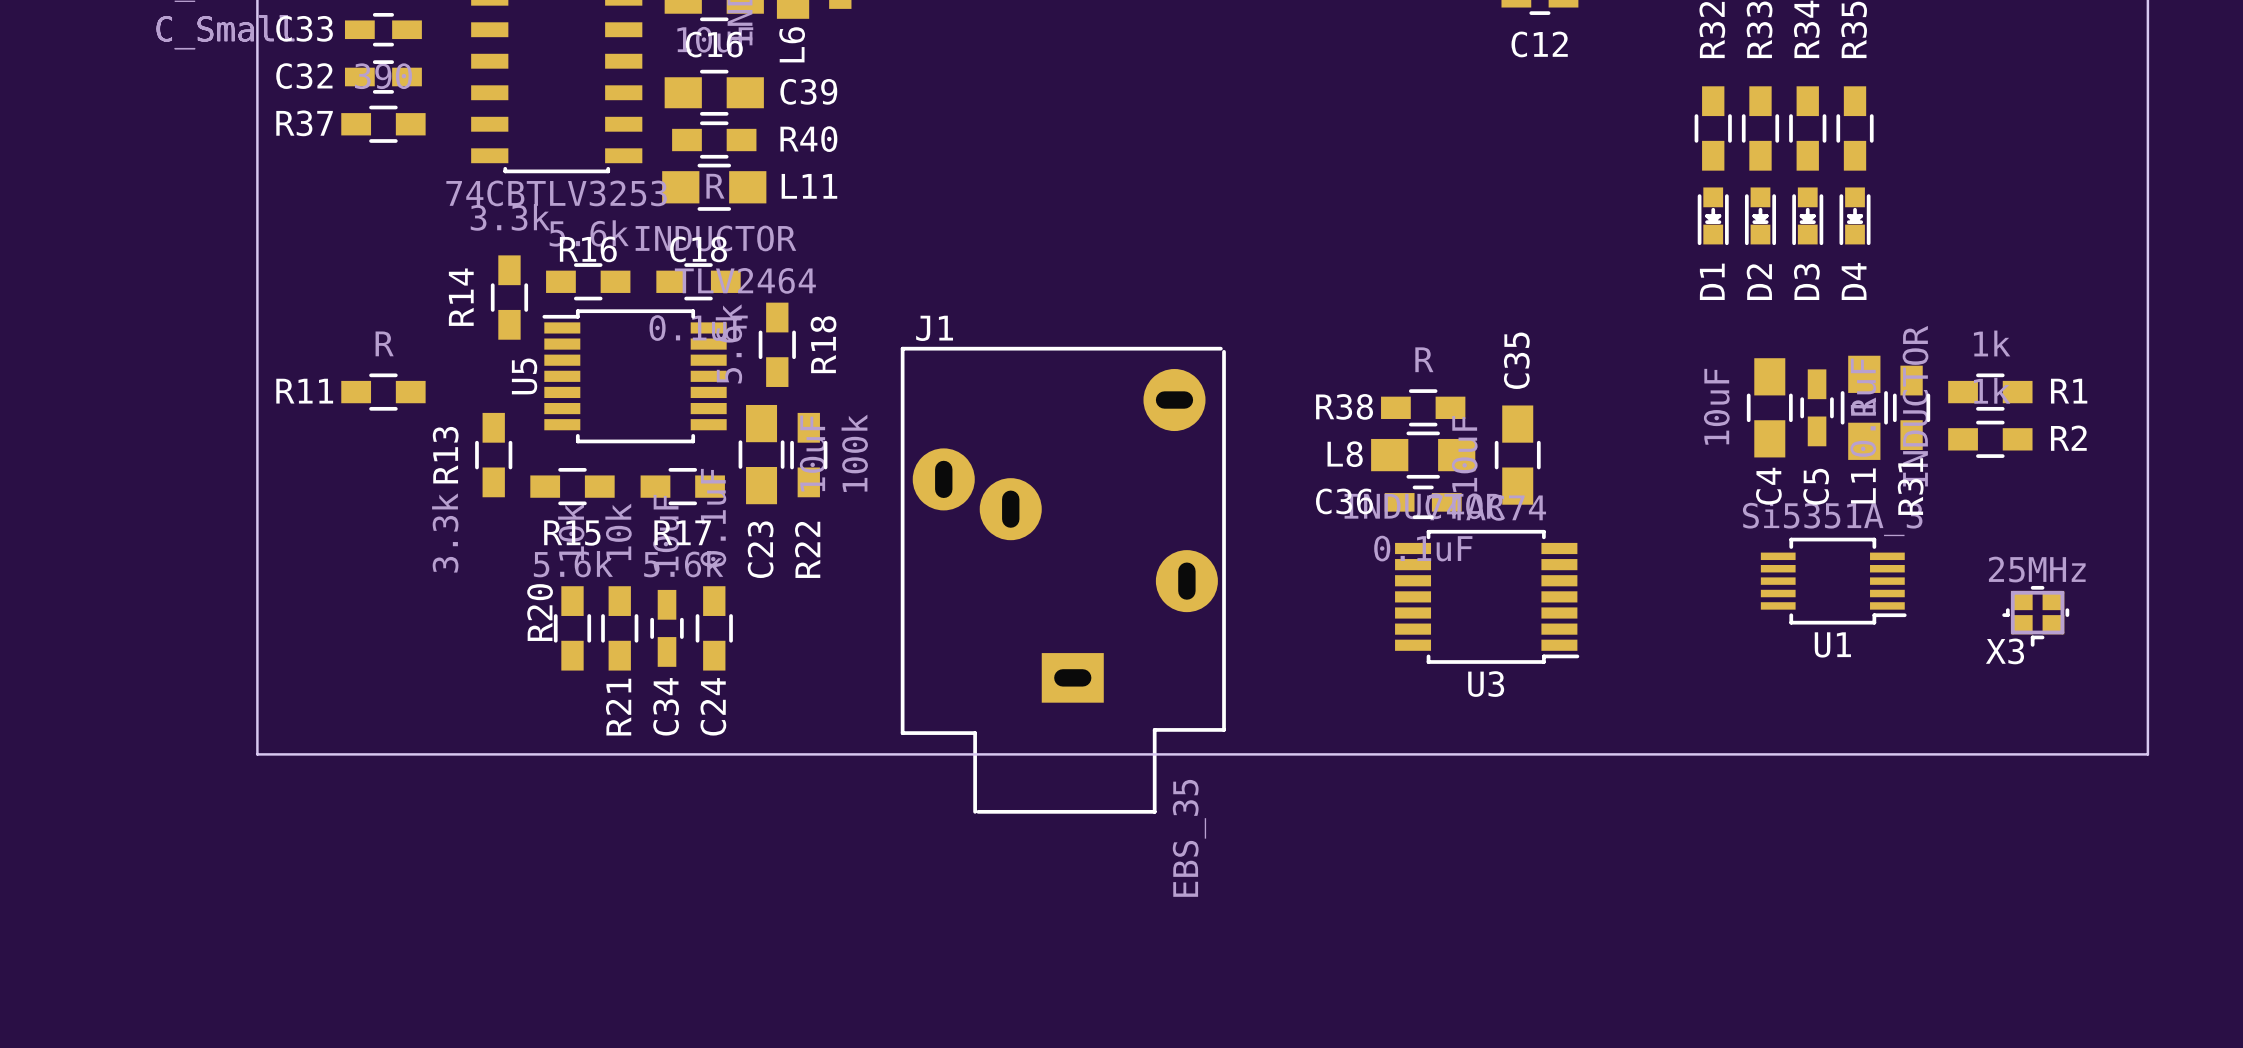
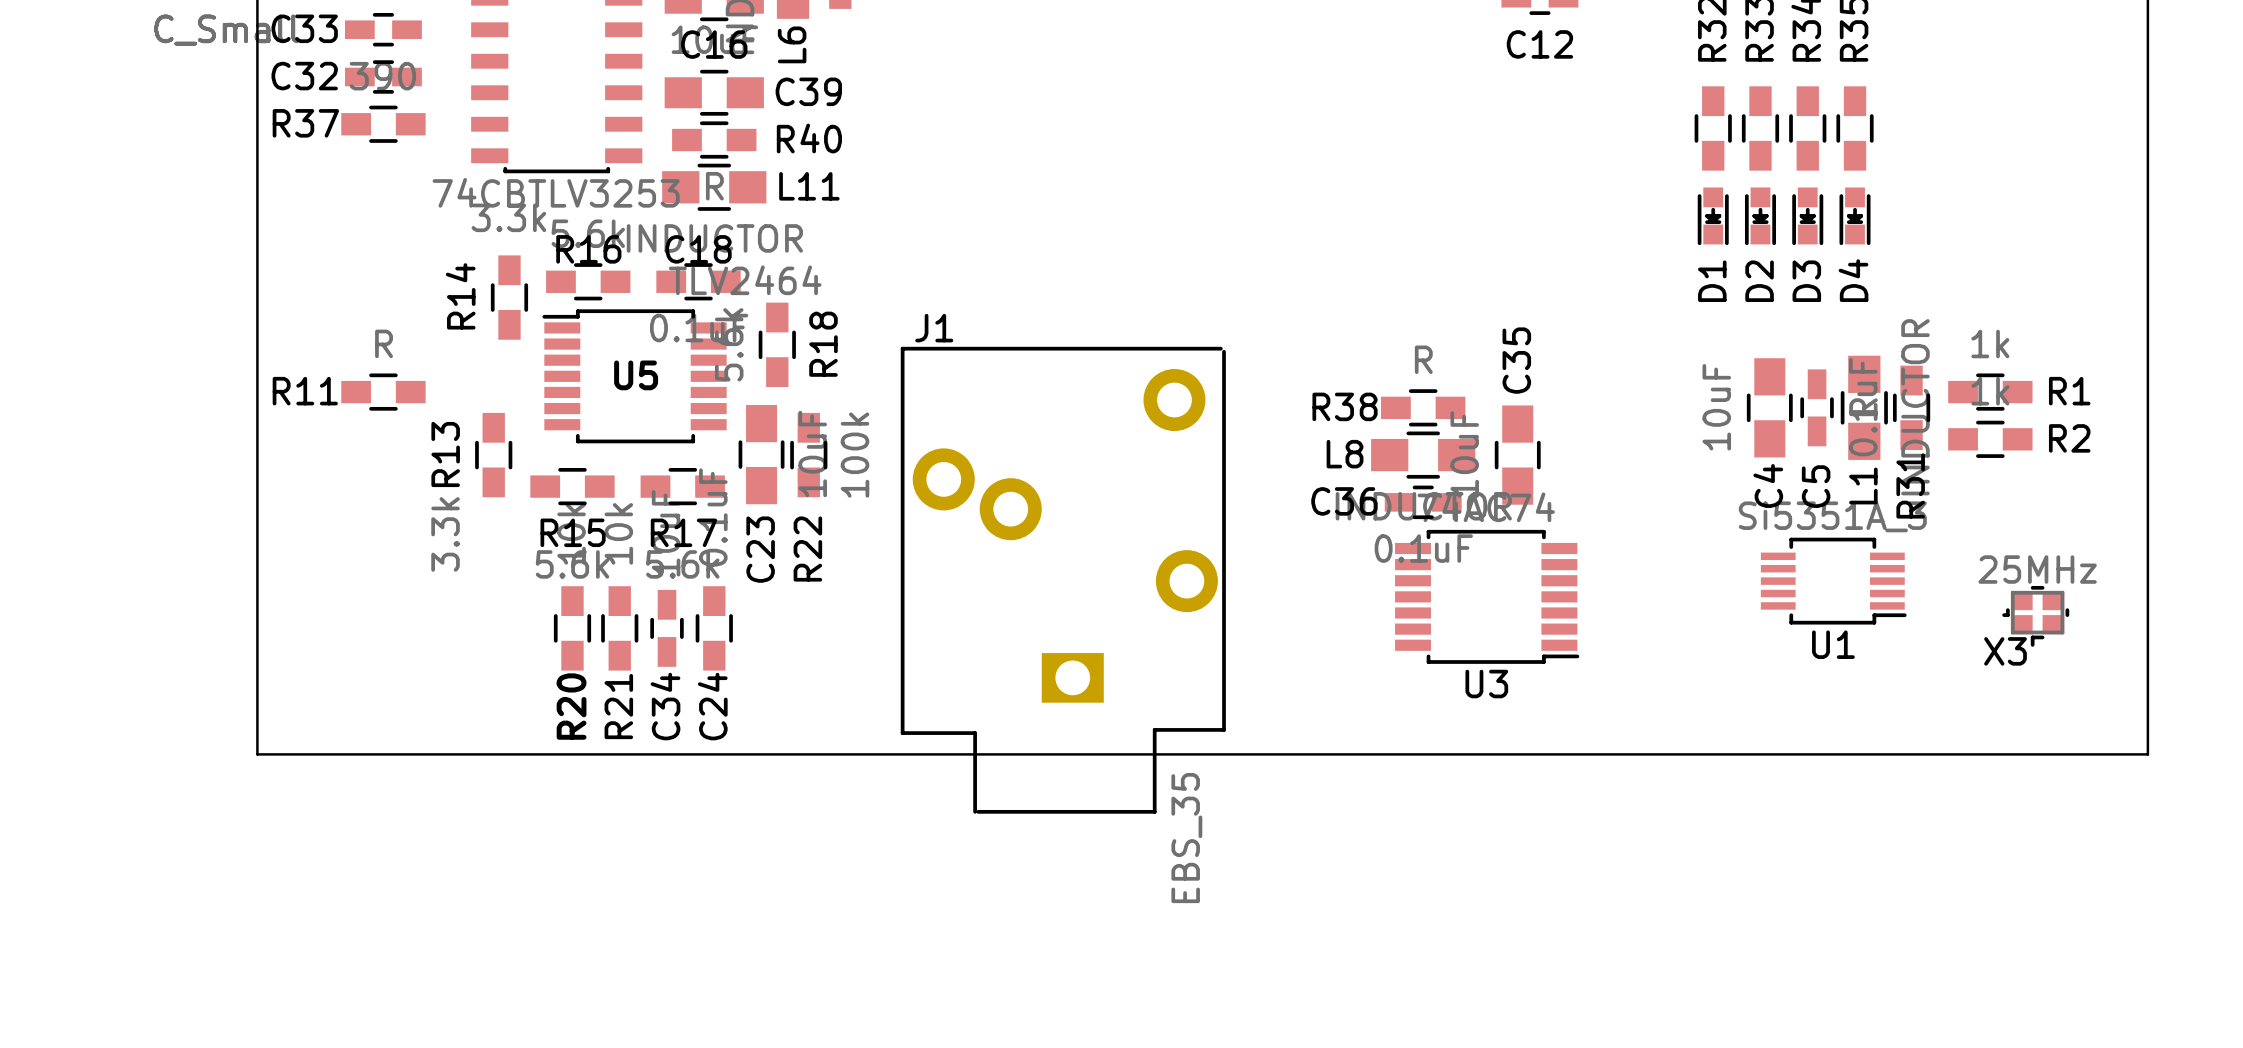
J1 footprint: [900, 346, 1226, 814] -> [900, 346, 1226, 814]
U5 name rotation: 0° (524, 376) -> 90° clockwise (636, 375)
U5 name position: U5 (524, 376) -> U5 (636, 375)
R20 name position: R20 (540, 612) -> R20 (571, 706)

